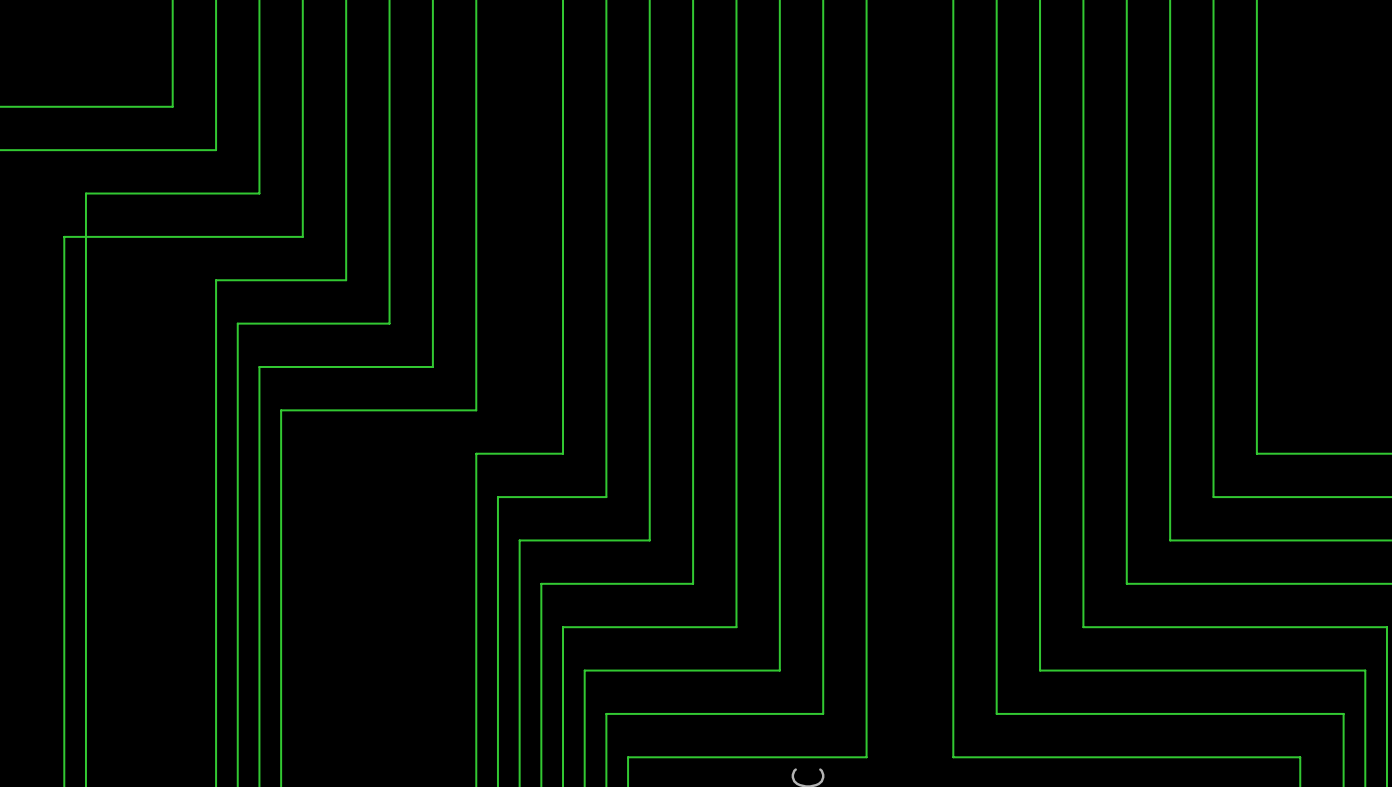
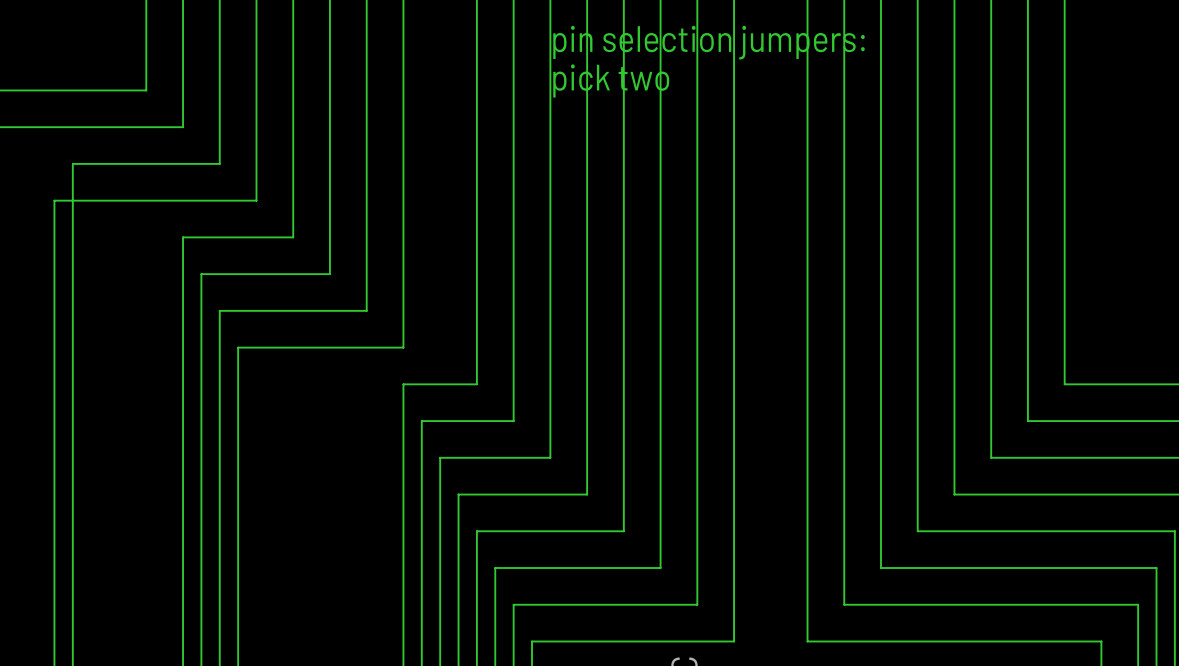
text: none -> pin selection jumpers: (709, 42)
text: none -> pick two (611, 80)

